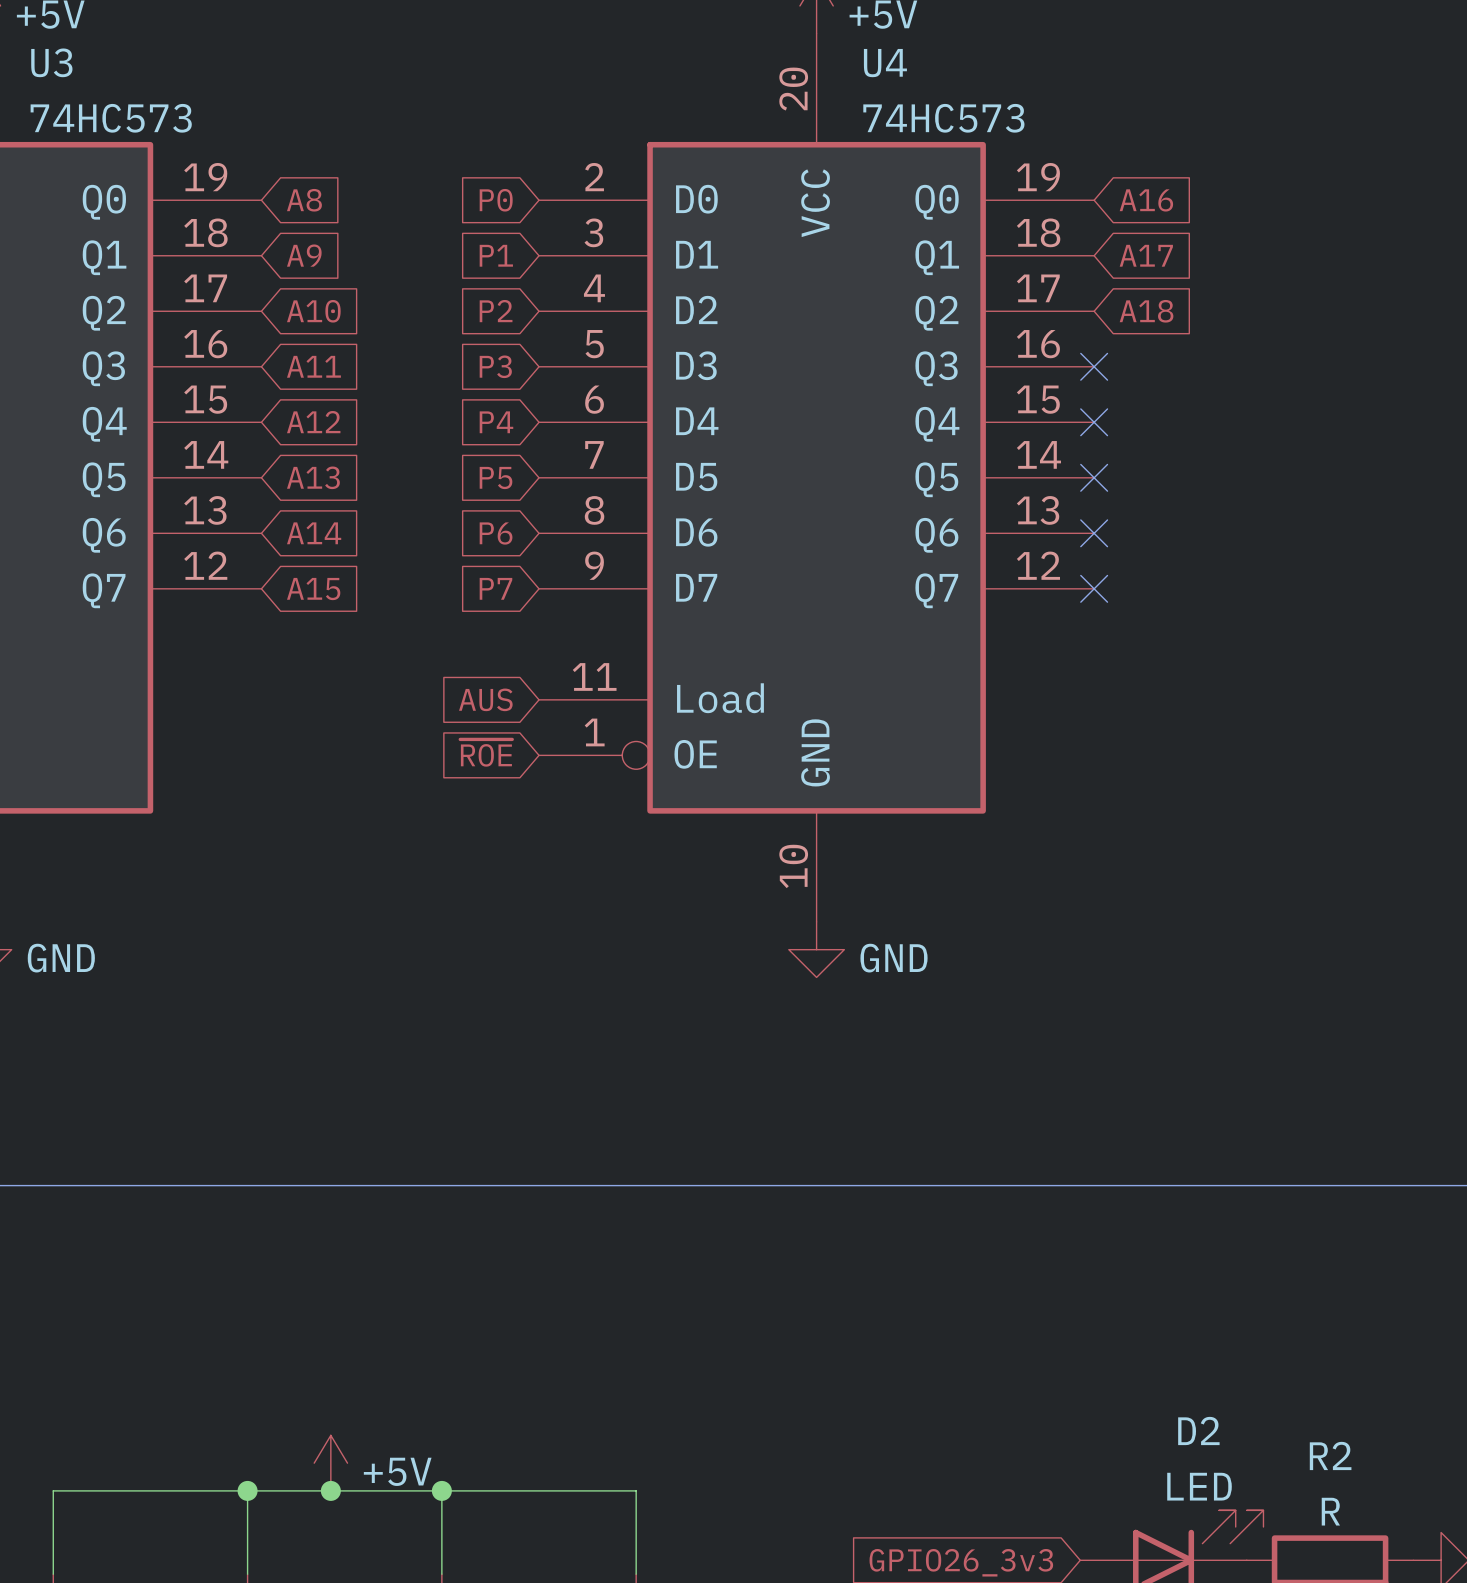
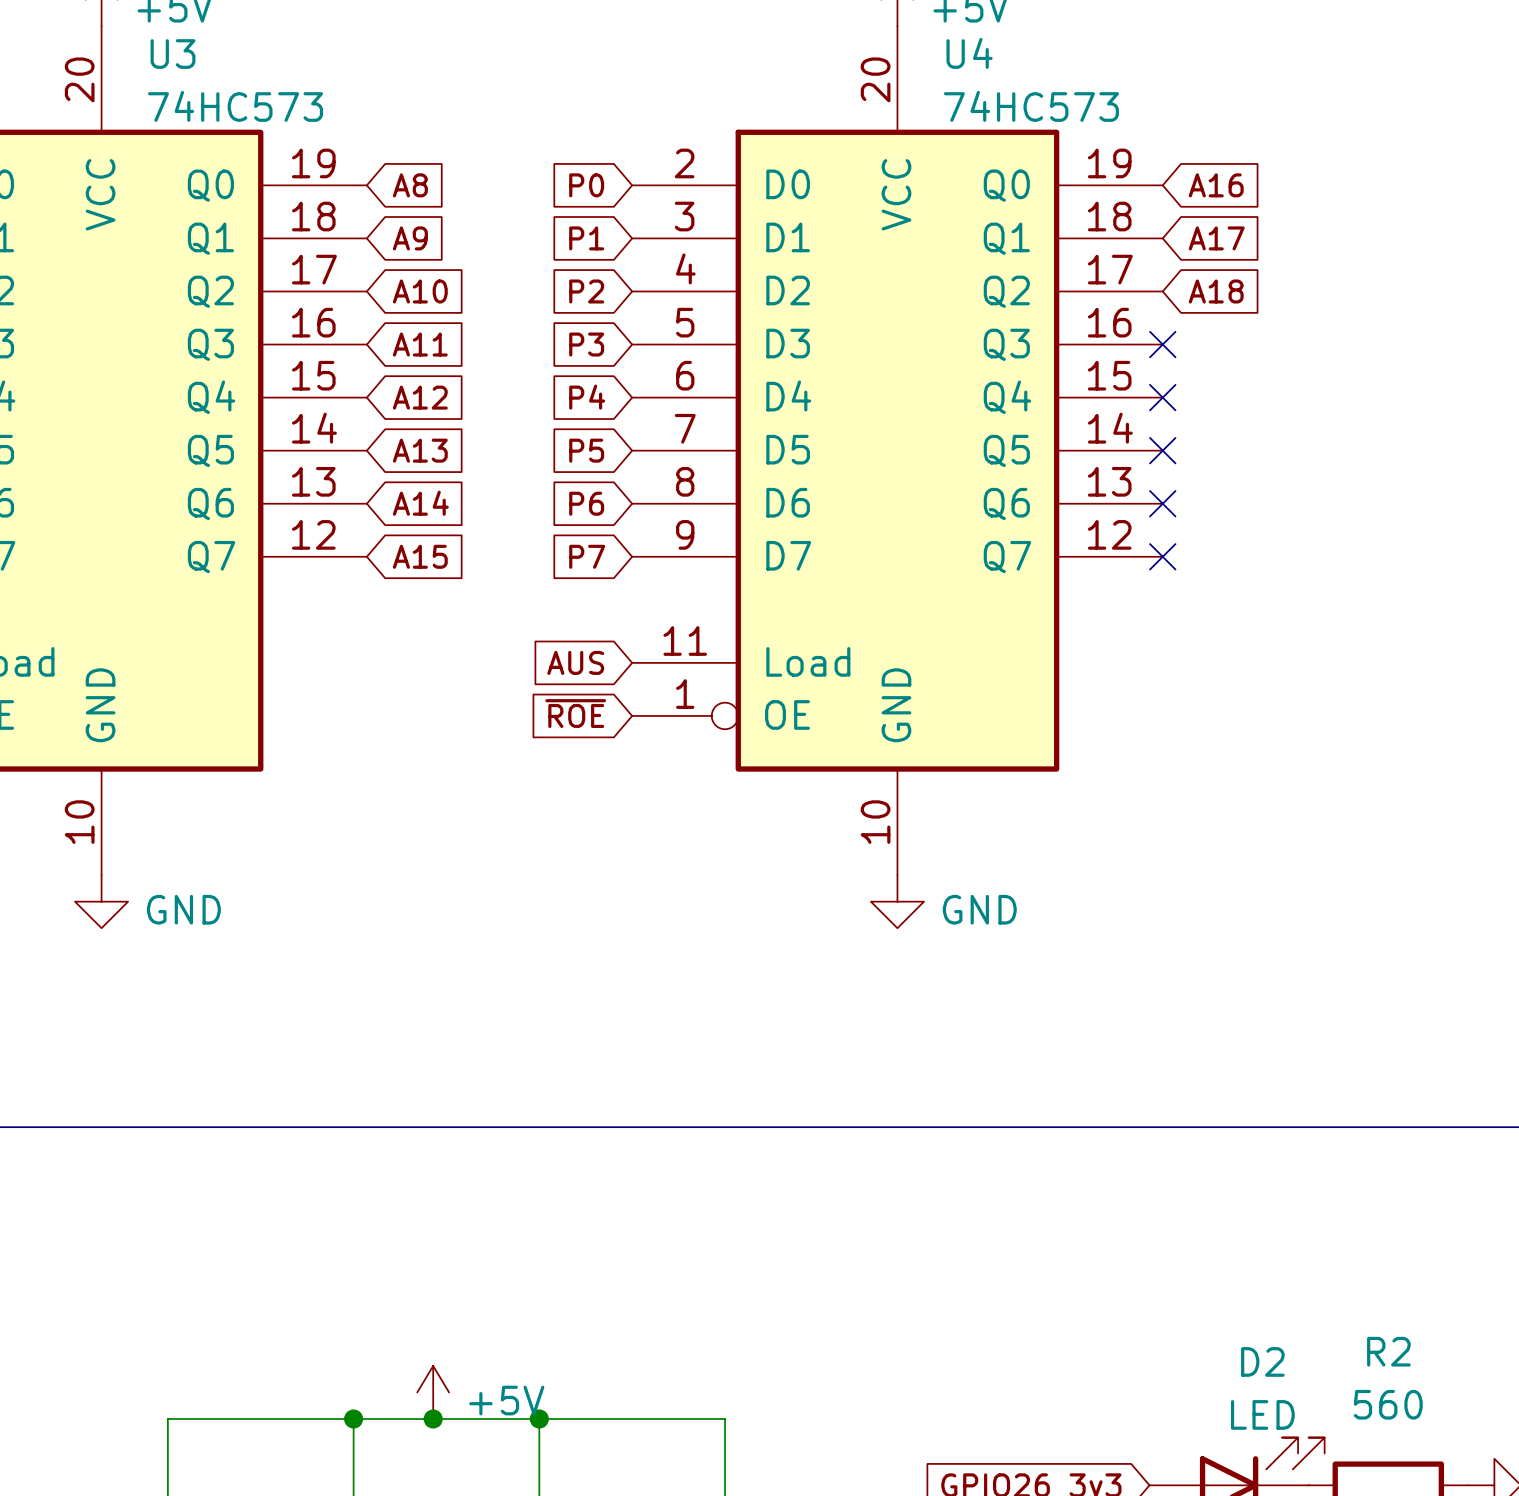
R2 name position: R2 (1330, 1455) -> R2 (1388, 1351)
R2 value: R (1330, 1511) -> 560 (1388, 1404)

